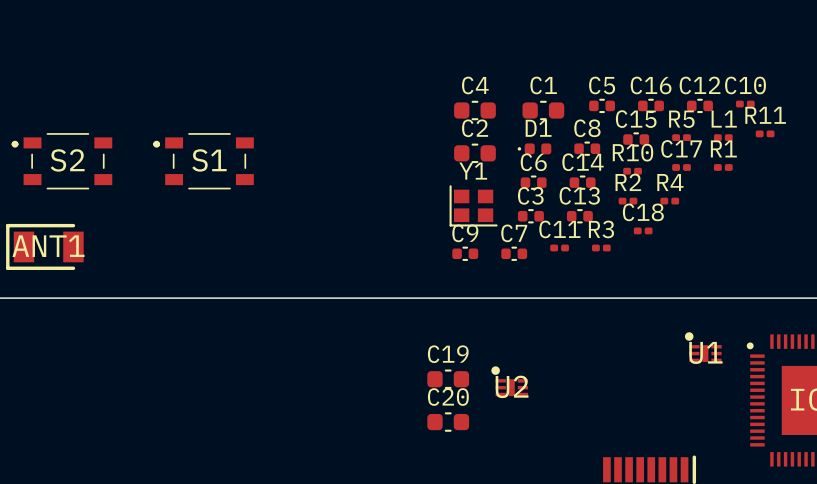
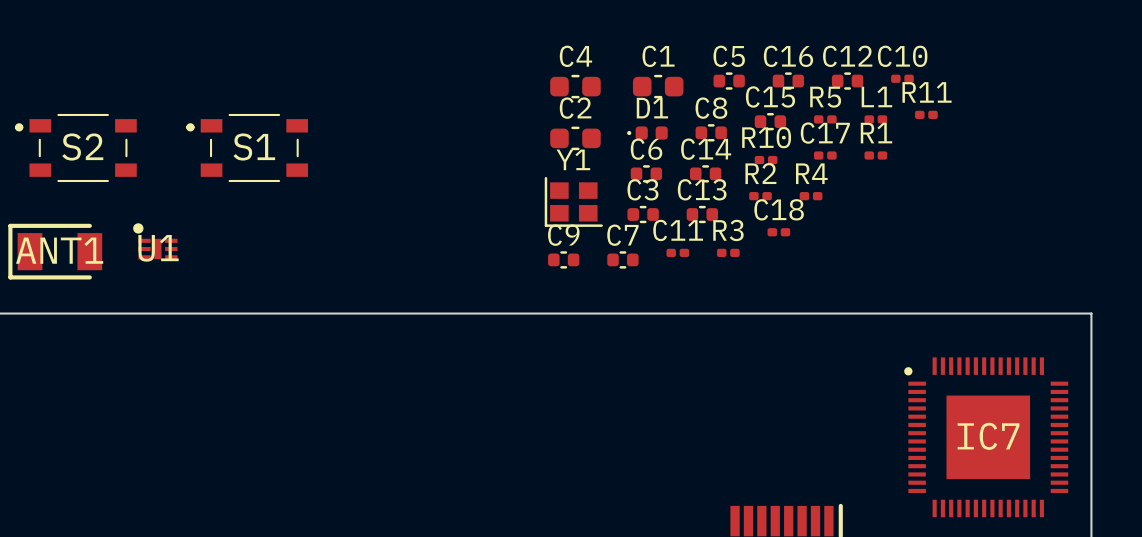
U1 position: (703, 347) -> (155, 241)
C19: (448, 379) -> none
U2: (509, 381) -> none
C20: (448, 422) -> none

